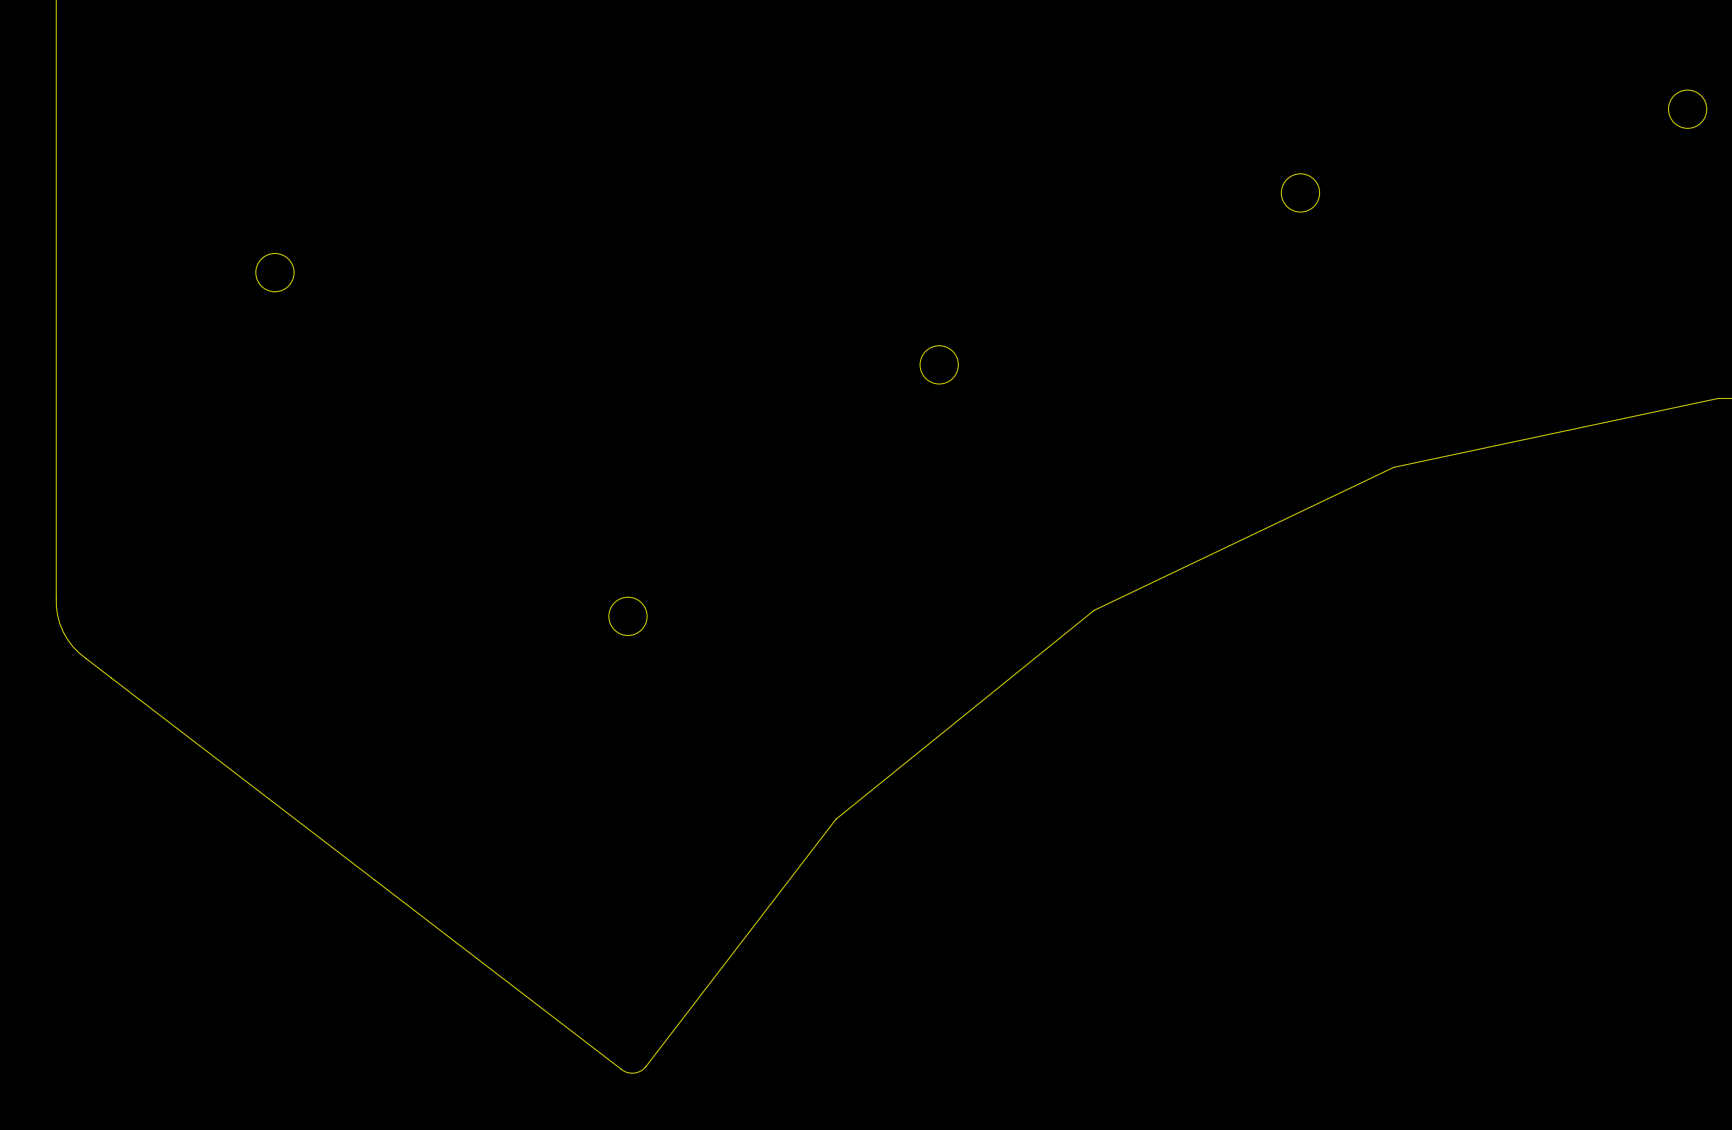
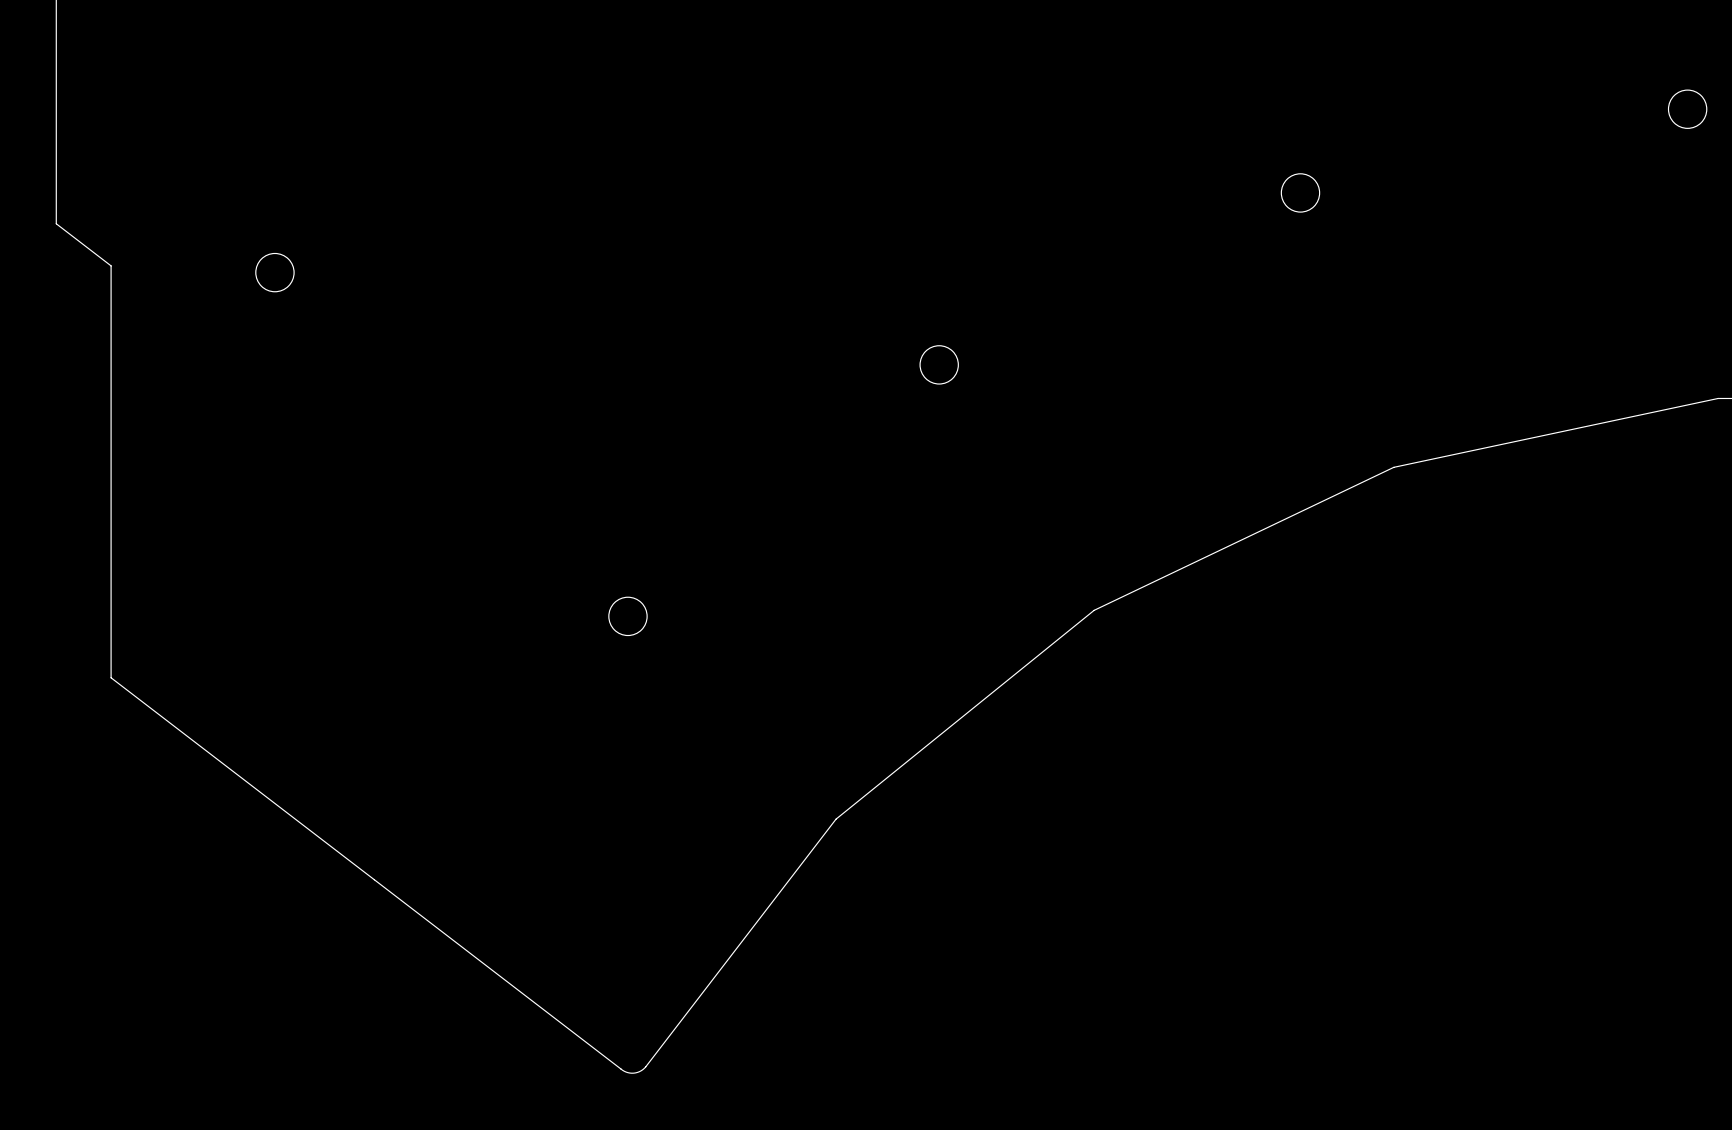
board edge: (56, 223) (56, 606) (59, 624) (72, 646) (111, 677) -> (56, 223) (111, 265) (111, 677)

